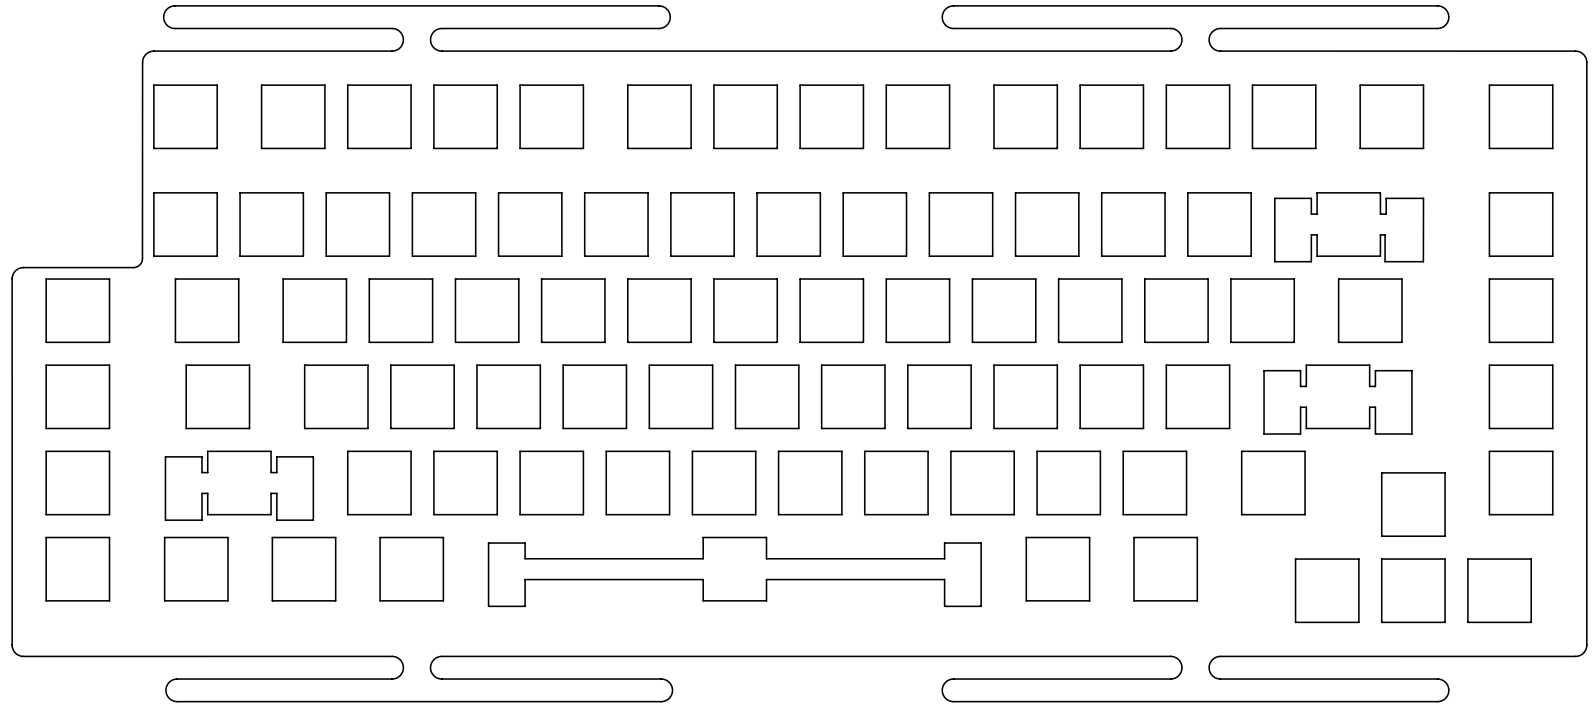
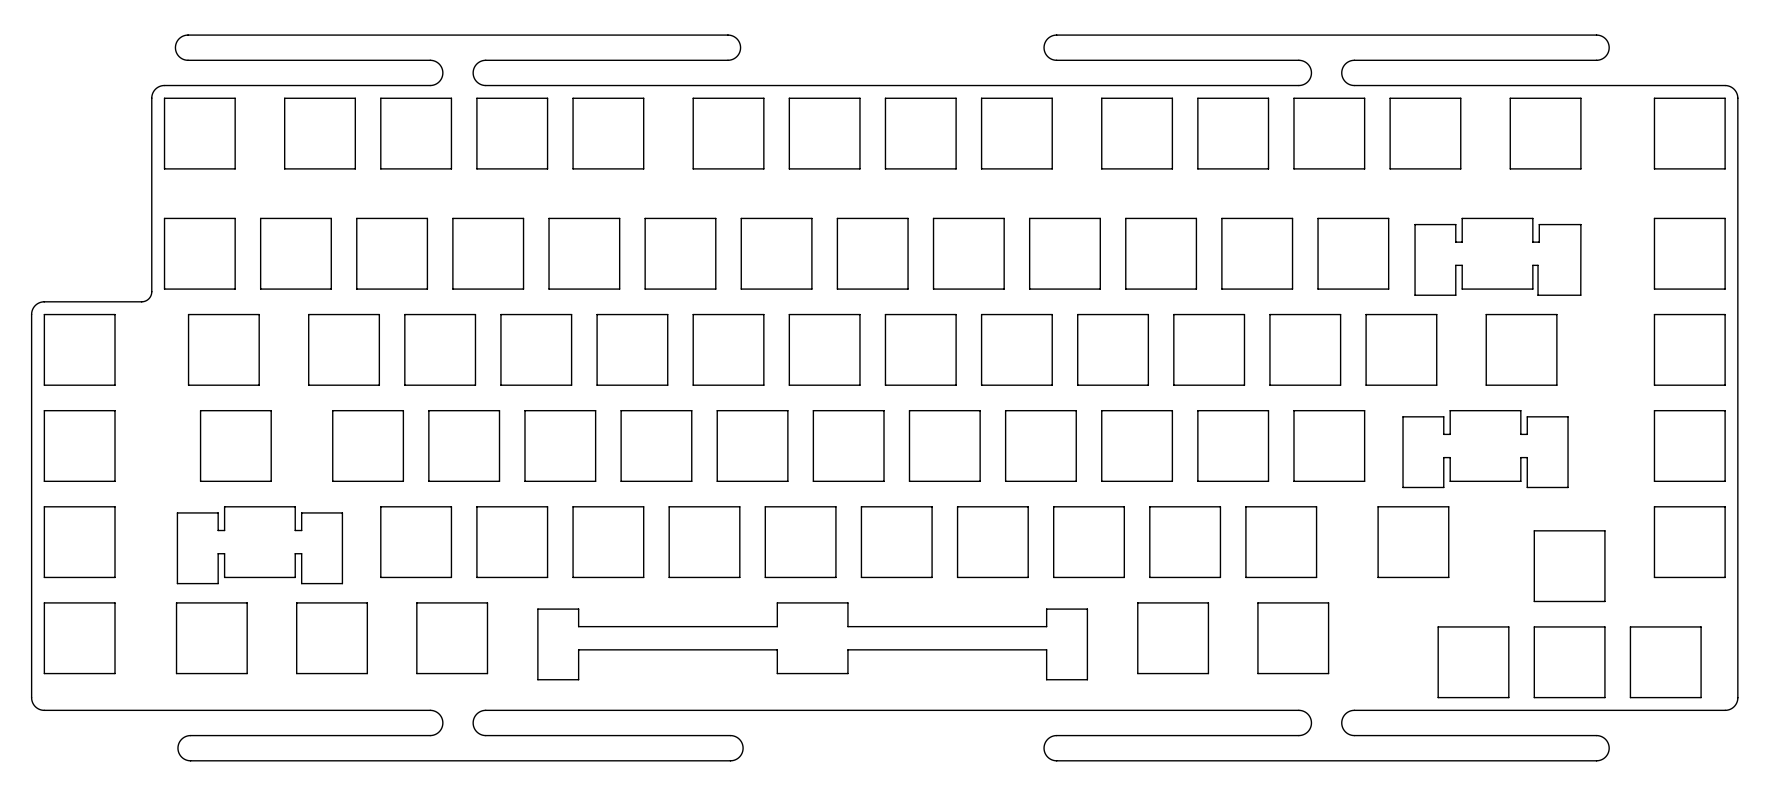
board edge: (174, 28) (167, 25) (163, 17) (167, 8) (174, 5) (658, 5) (666, 9) (670, 17) (666, 25) (658, 28) -> none
board edge: (392, 28) (399, 31) (403, 39) (400, 47) (393, 51) (153, 51) (145, 54) (142, 62) (142, 258) -> (188, 35) (179, 38) (175, 47) (179, 56) (186, 60) (430, 60) (440, 65) (442, 74) (439, 81) (430, 85) (164, 85) (156, 88) (151, 98) (151, 291)
board edge: (441, 28) (434, 31) (430, 39) (433, 47) (441, 51) -> (485, 35) (430, 35)
board edge: (953, 28) (946, 25) (942, 17) (945, 9) (953, 5) (1437, 5) (1445, 9) (1448, 17) (1445, 25) (1437, 28) -> (1056, 35) (1047, 38) (1044, 47) (1047, 56) (1056, 60)
board edge: (1170, 28) (1178, 31) (1181, 39) (1178, 47) (1170, 51) -> (1298, 35) (1354, 35)
board edge: (1220, 28) (1212, 31) (1209, 38) (1211, 47) (1219, 51) (1575, 51) (1583, 54) (1586, 62) (1586, 645) (1585, 651) (1575, 656) (1218, 656) (1212, 659) (1209, 667) (1212, 675) (1220, 679) -> none
board edge: none -> (1596, 35) (1606, 39) (1609, 47) (1606, 56) (1598, 60) (1354, 60) (1345, 63) (1341, 74) (1346, 82) (1354, 85) (1725, 85) (1731, 87) (1736, 91) (1737, 98) (1737, 701) (1733, 707) (1725, 710) (1354, 710) (1345, 714) (1341, 722) (1345, 731) (1354, 735) (1598, 735) (1606, 739) (1609, 748) (1606, 756) (1596, 760)
board edge: none -> (485, 60) (477, 63) (473, 72) (476, 81) (485, 85) (1298, 85) (1307, 81) (1311, 72) (1307, 63) (1298, 60)
board edge: (658, 51) (953, 51) -> (727, 60) (736, 56) (740, 47) (736, 38) (727, 35)
board edge: (46, 267) (20, 267) (15, 270) (12, 277) (12, 648) (16, 654) (23, 656) (177, 656) -> (44, 301) (35, 305) (31, 314) (31, 697) (34, 705) (44, 710) (431, 710) (440, 715) (442, 724) (437, 732) (430, 735)
board edge: (392, 656) (400, 659) (403, 667) (400, 675) (392, 679) -> (485, 760) (430, 760)
board edge: (441, 656) (434, 659) (430, 667) (433, 675) (441, 679) -> (485, 735) (477, 732) (473, 722) (477, 713) (485, 710) (1298, 710) (1307, 714) (1311, 722) (1307, 731) (1298, 735)
board edge: (661, 656) (953, 656) -> (730, 735) (739, 739) (743, 748) (739, 757) (730, 760)
board edge: (1170, 656) (1179, 660) (1181, 667) (1178, 676) (1170, 679) -> (1354, 760) (1298, 760)
board edge: (177, 679) (169, 681) (165, 690) (169, 698) (177, 701) (661, 701) (669, 697) (672, 690) (668, 681) (661, 679) -> (190, 760) (181, 757) (177, 748) (181, 739) (190, 735)
board edge: (953, 679) (945, 682) (942, 690) (945, 698) (953, 701) (1437, 701) (1445, 698) (1448, 690) (1445, 682) (1437, 679) -> (1056, 760) (1047, 757) (1044, 748) (1047, 739) (1056, 735)

